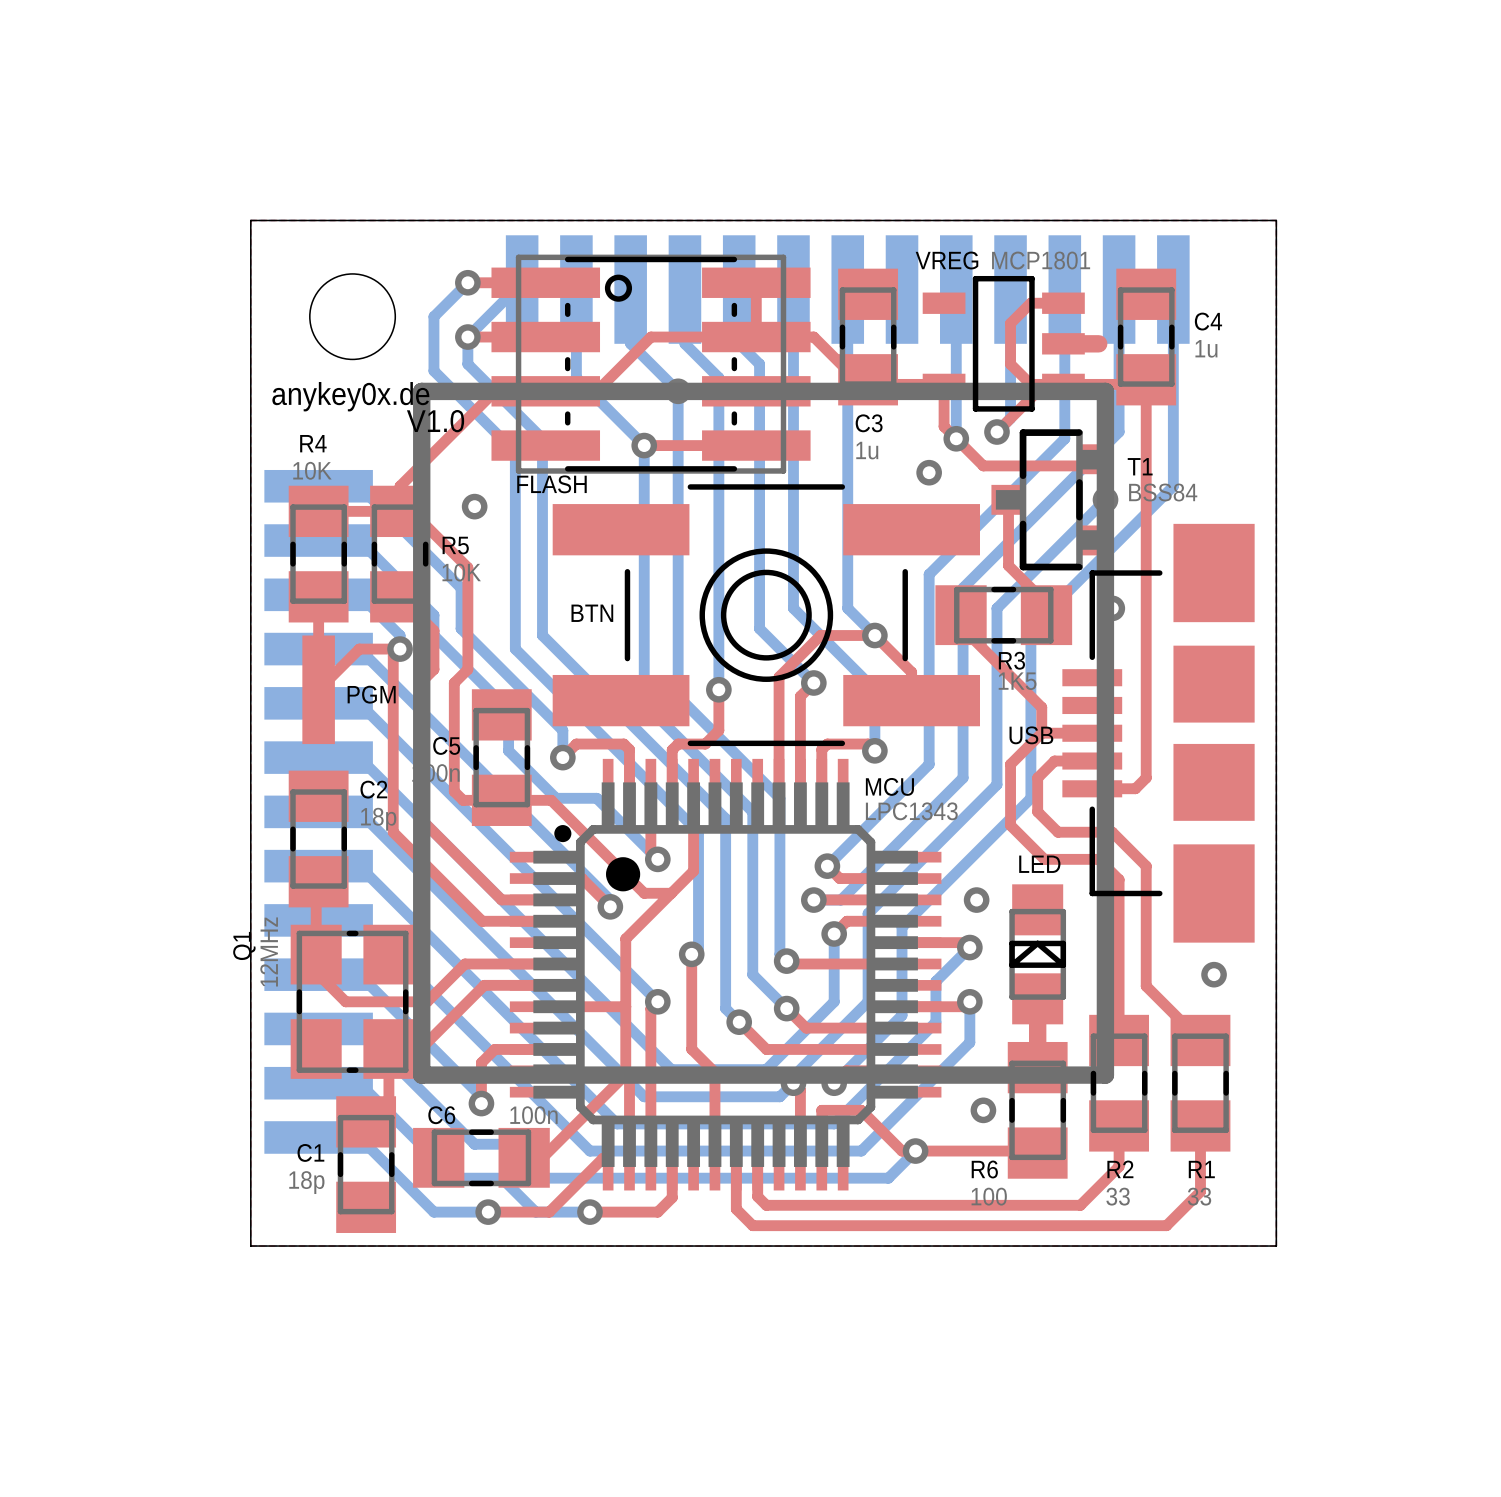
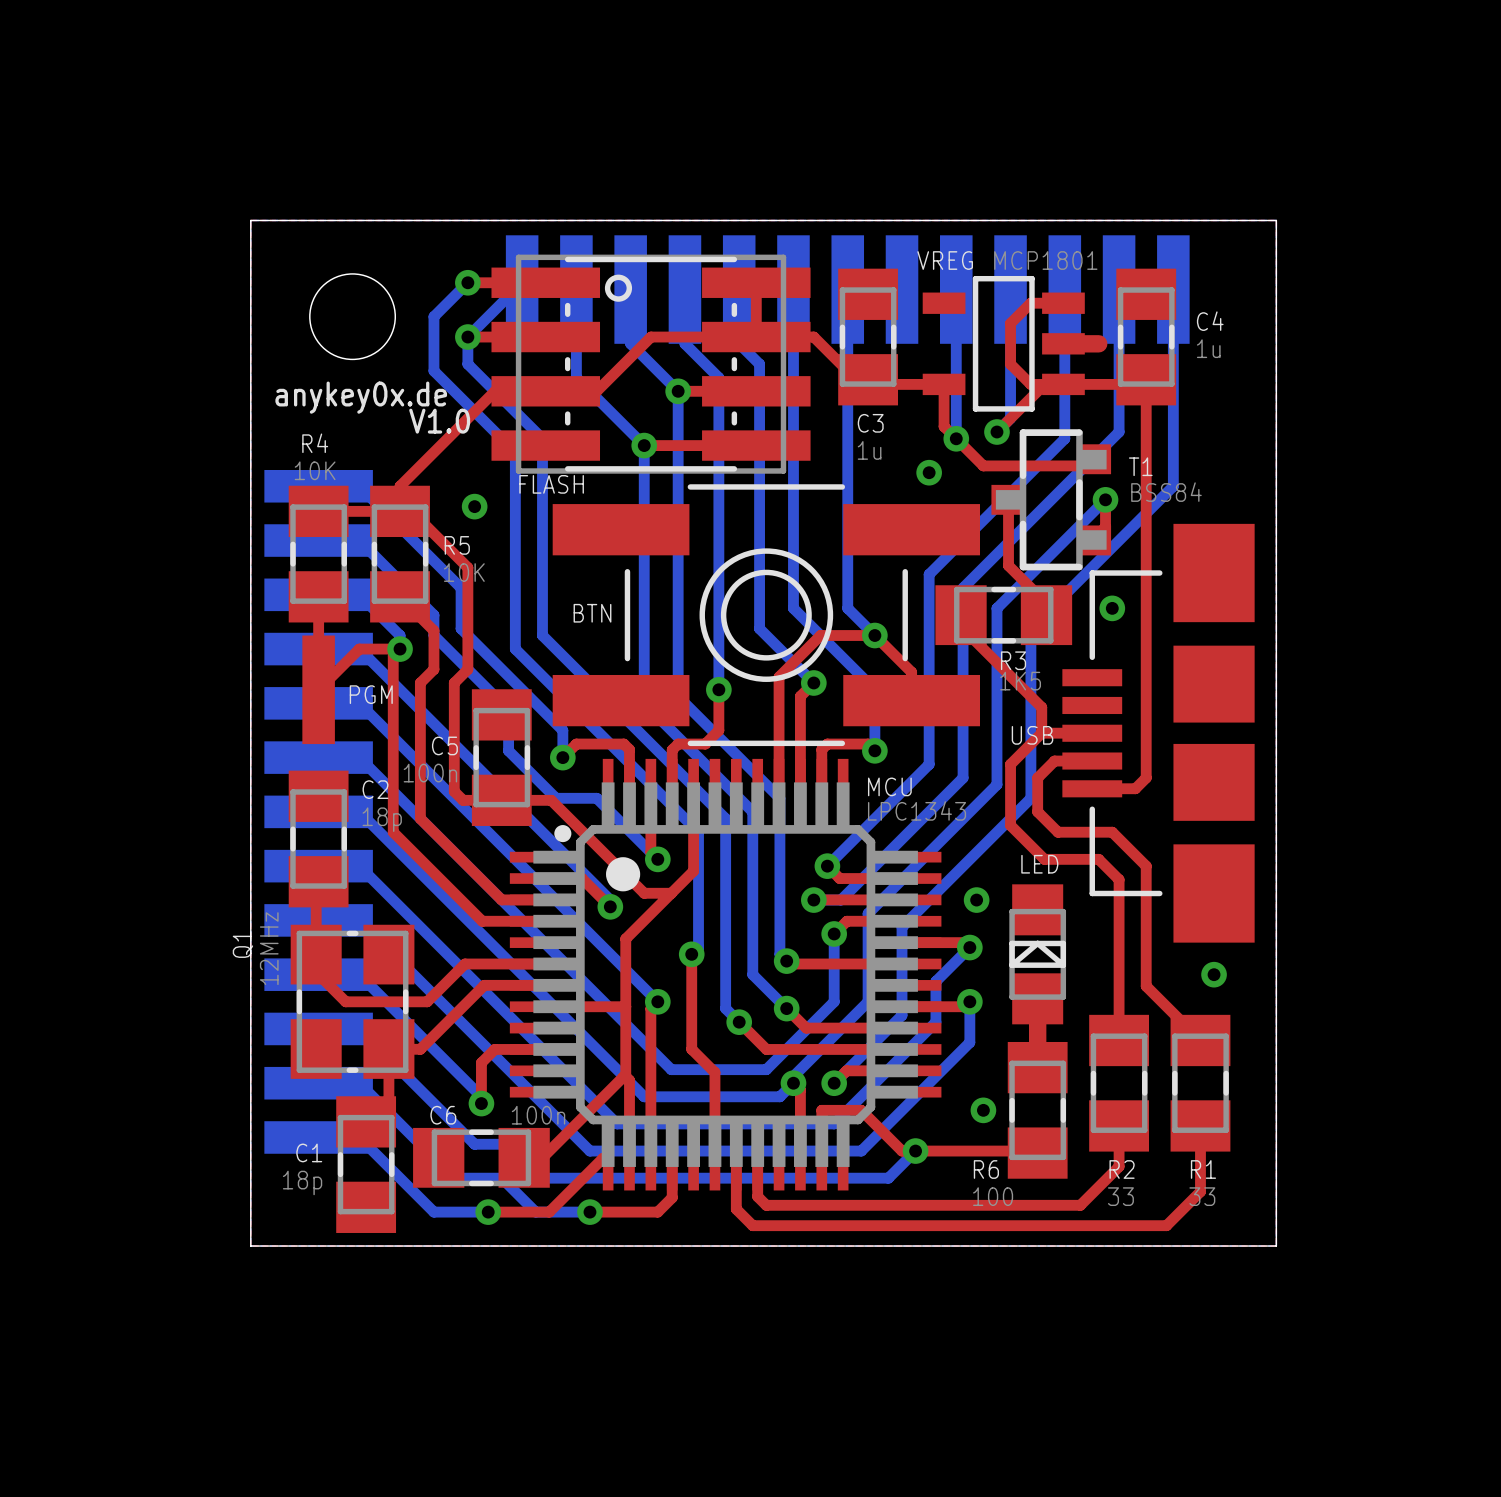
line: (421, 391) (1105, 391) (1105, 1075) (421, 1075) (421, 391) -> none

